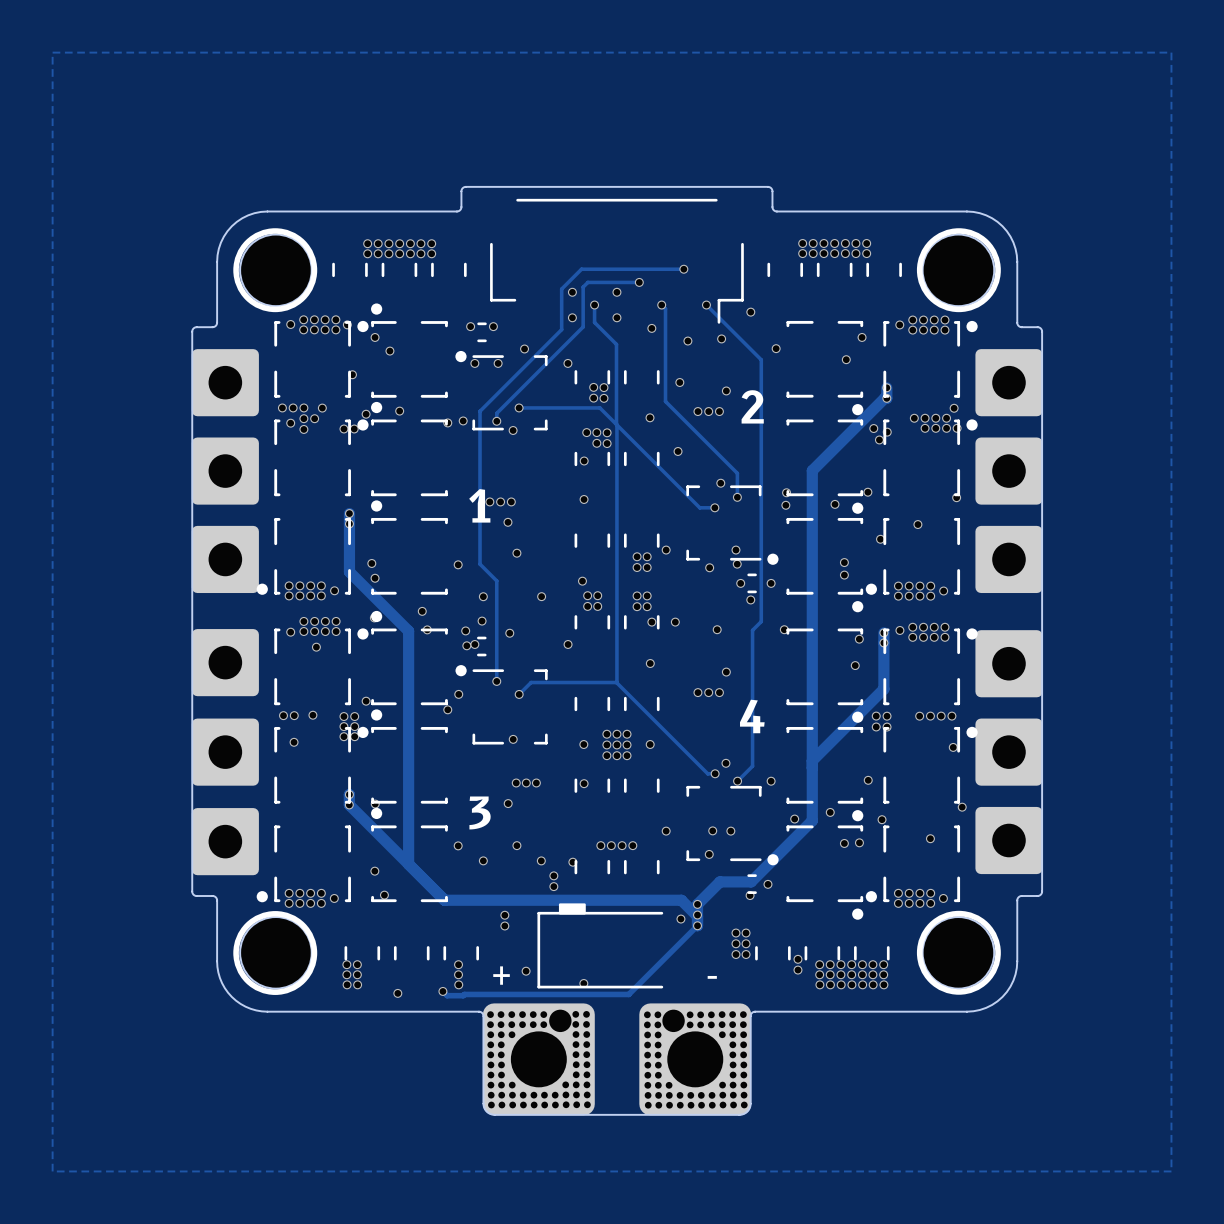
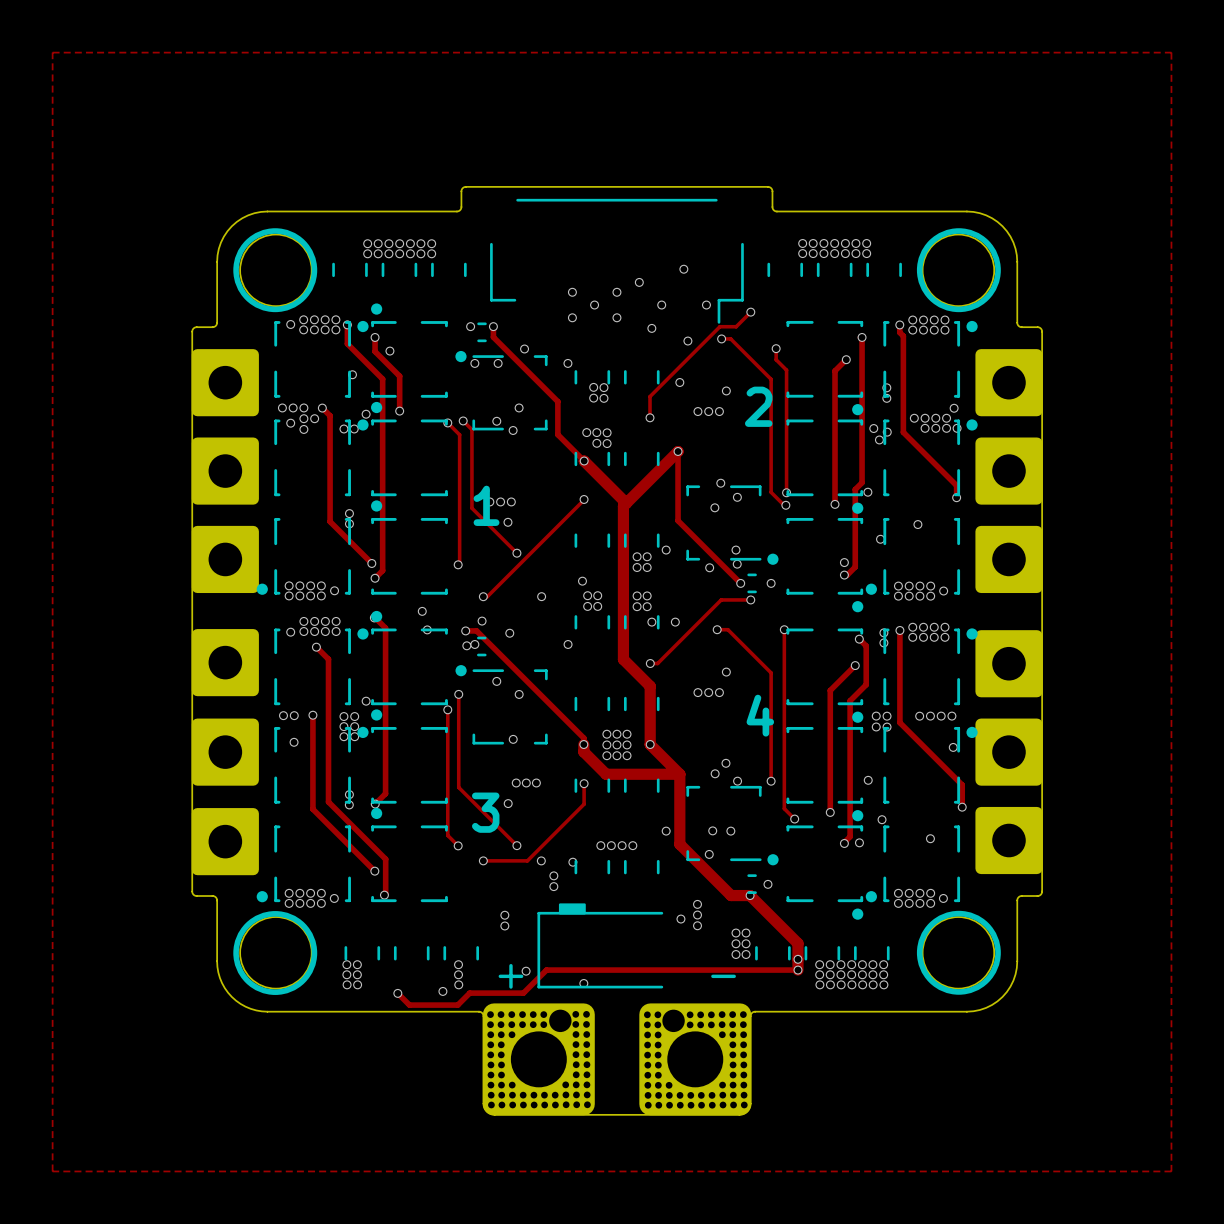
track: (683, 269) (581, 269) (561, 289) (561, 329) (480, 411) (480, 564) (496, 580) (496, 681) -> none
track: (639, 282) (587, 282) (583, 287) (583, 326) (496, 413) (496, 421) -> none
track: (594, 305) (594, 322) (616, 344) (616, 424) -> none
track: (661, 305) (665, 308) (665, 401) (737, 473) (737, 497) -> none
track: (706, 305) (761, 359) (761, 621) (752, 630) (752, 766) (737, 781) -> none
track: none -> (750, 312) (736, 326) (719, 326) (650, 396) (650, 417)
track: none -> (347, 324) (347, 343) (382, 379) (382, 570) (375, 578)
track: none -> (899, 324) (899, 332) (903, 336) (903, 432) (956, 485) (956, 497)
track: none -> (493, 326) (493, 337) (557, 401) (557, 434) (584, 460)
track: none -> (375, 337) (375, 351) (399, 376) (399, 411)
track: none -> (862, 337) (862, 482) (855, 489) (855, 567) (847, 575) (844, 575)
track: none -> (721, 338) (730, 339) (771, 379) (771, 492) (785, 505)
track: none -> (776, 348) (776, 359) (786, 370) (786, 492)
track: none -> (846, 359) (835, 370) (835, 504)
track: (886, 387) (886, 398) (884, 398) (812, 470) (812, 820) (751, 881) (719, 881) (697, 904) (697, 925) (628, 994) (447, 995) (442, 991) -> none
track: (519, 407) (599, 407) (699, 507) (714, 507) -> none
track: none -> (322, 408) (330, 415) (330, 521) (371, 563)
track: none -> (463, 420) (471, 429) (471, 508) (516, 553)
track: none -> (447, 422) (459, 434) (458, 564)
track: (616, 424) (616, 682) -> none
track: none -> (584, 461) (626, 503)
track: none -> (584, 499) (487, 596) (483, 596)
track: (349, 513) (349, 571) (408, 631) (408, 864) -> none
track: none -> (740, 583) (678, 520) (678, 451) (623, 506) (623, 659) (650, 686) (650, 744) (679, 774)
track: none -> (750, 599) (721, 599) (657, 663) (650, 663)
track: none -> (374, 617) (385, 628) (385, 793) (375, 804)
track: none -> (717, 629) (727, 629) (771, 672) (771, 781)
track: none -> (784, 629) (784, 808) (794, 819)
track: none -> (465, 630) (476, 630) (583, 738) (583, 751) (606, 774) (679, 774)
track: none -> (899, 630) (899, 722) (962, 785) (962, 807)
track: (883, 632) (883, 689) (812, 760) -> none
track: none -> (859, 639) (866, 646) (866, 684) (850, 700) (850, 836) (844, 843)
track: none -> (316, 647) (328, 659) (328, 802) (385, 859) (384, 895)
track: none -> (855, 665) (830, 690) (830, 812)
track: (616, 682) (531, 682) (519, 694) -> none
track: (616, 682) (707, 773) (715, 773) -> none
track: none -> (458, 694) (458, 787) (516, 845)
track: none -> (447, 709) (447, 835) (458, 845)
track: none -> (312, 715) (312, 809) (374, 871)
track: none -> (679, 774) (679, 844) (731, 895) (750, 895) (797, 943) (797, 970) (546, 970) (523, 993) (469, 993) (457, 1005) (409, 1005) (397, 993)
track: none -> (584, 783) (584, 804) (527, 860) (483, 860)
track: (349, 794) (349, 804) (444, 900) (681, 900) (697, 916) -> none

